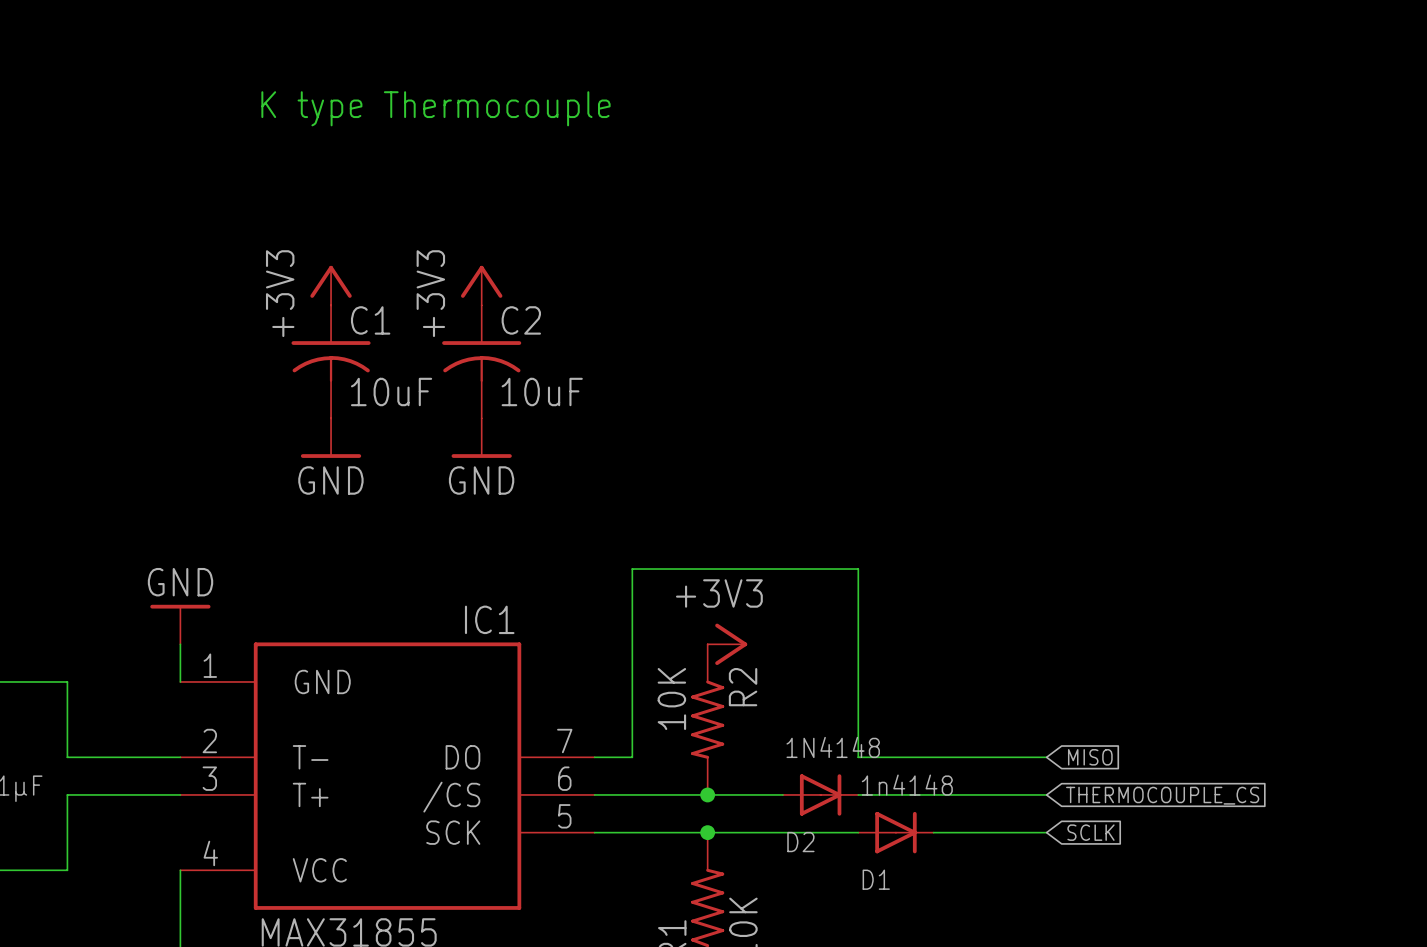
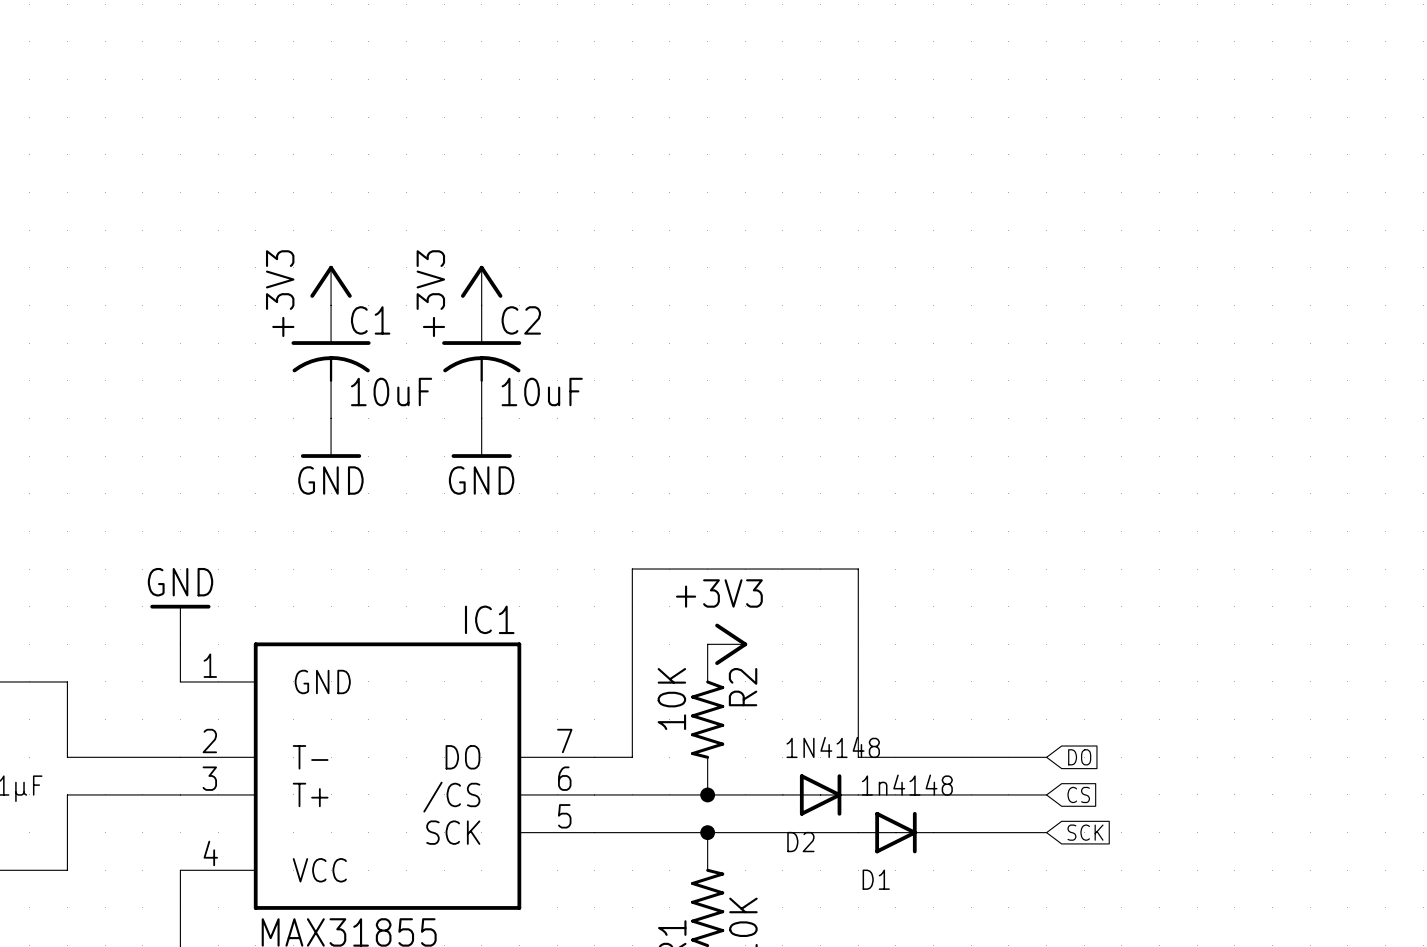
text: K type Thermocouple (435, 108) -> none
global label: MISO (1090, 757) -> DO (1079, 757)
global label: THERMOCOUPLE_CS (1162, 795) -> CS (1078, 794)
global label: SCLK (1090, 832) -> SCK (1085, 832)

